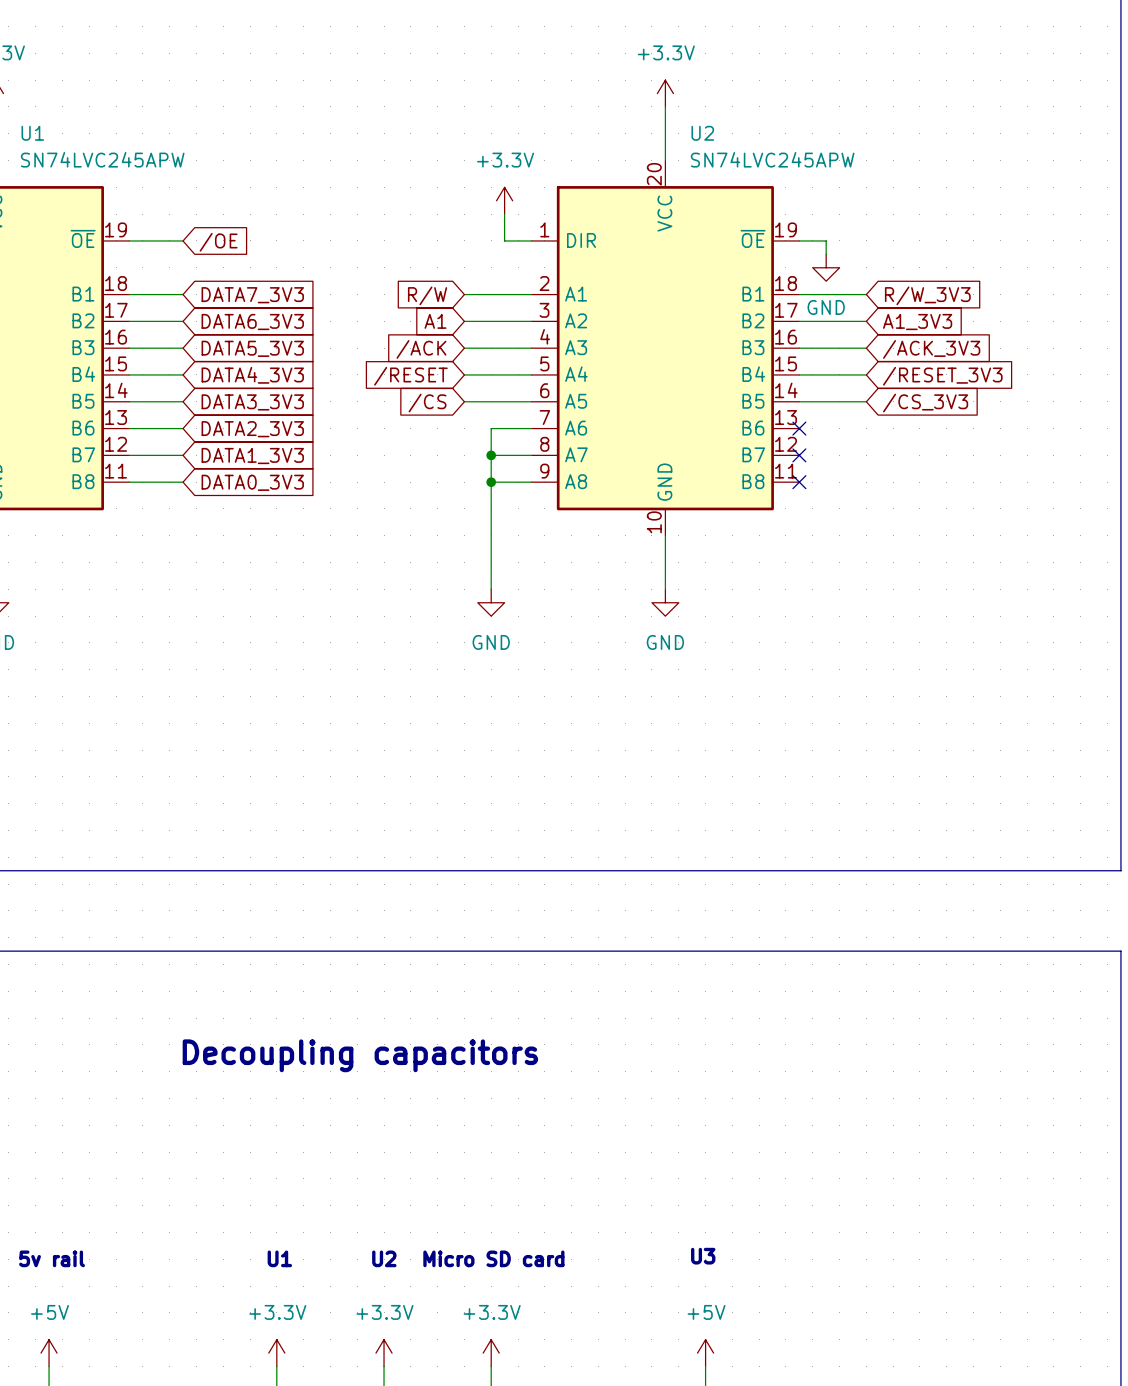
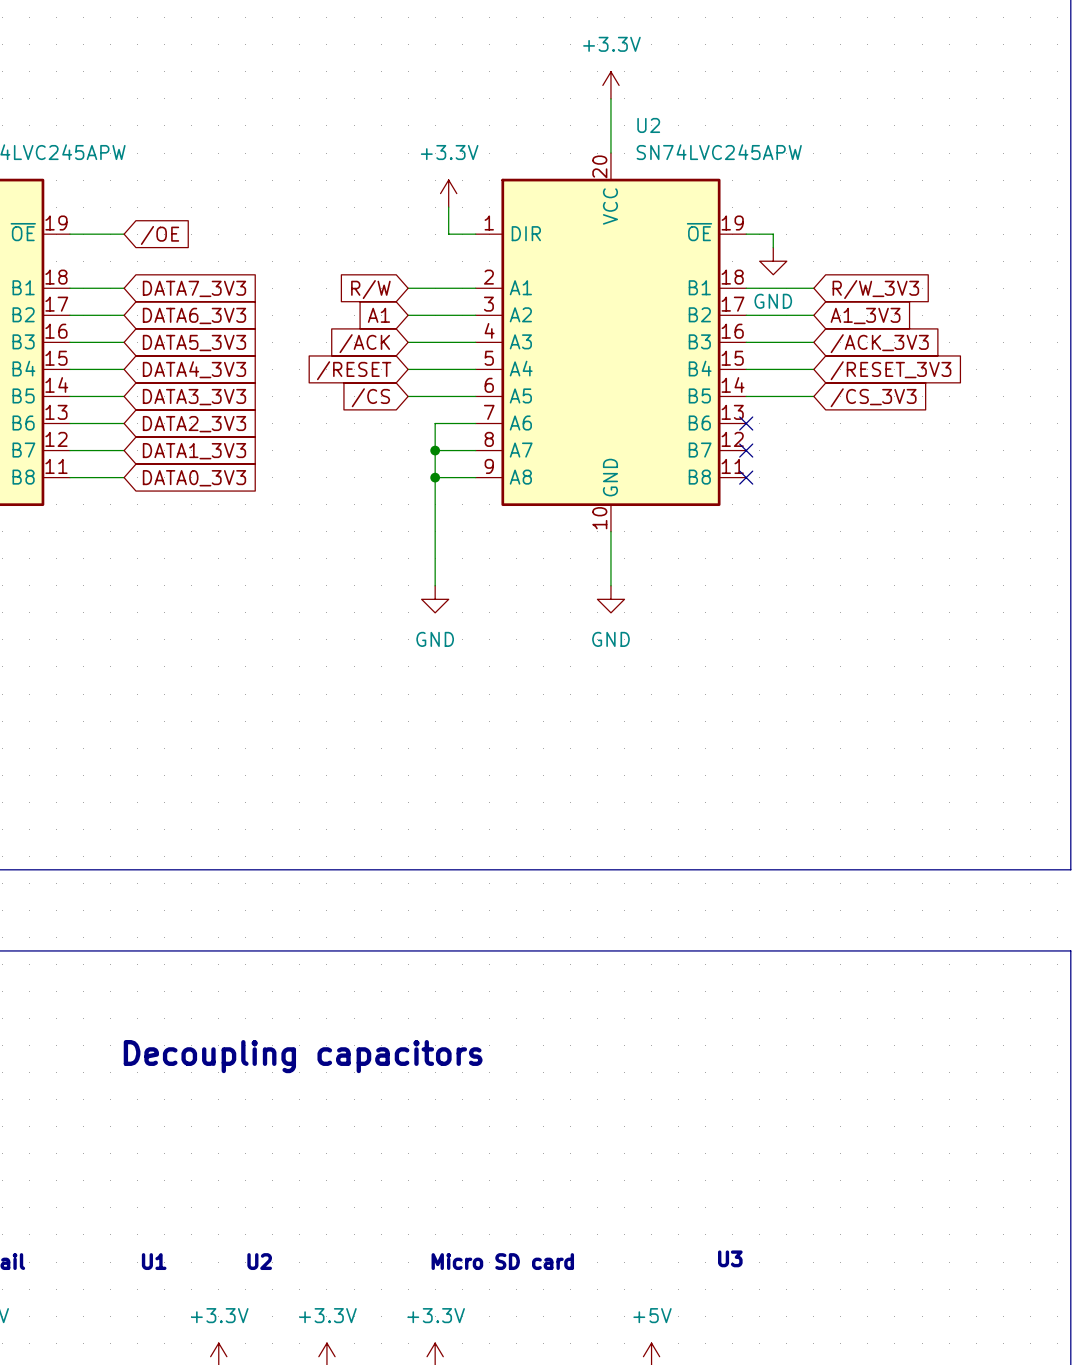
text position: U3 (703, 1256) -> U3 (730, 1258)
text position: U1 (279, 1258) -> U1 (154, 1261)
text position: U2 (384, 1258) -> U2 (259, 1261)
text position: Micro SD card (493, 1258) -> Micro SD card (502, 1261)

